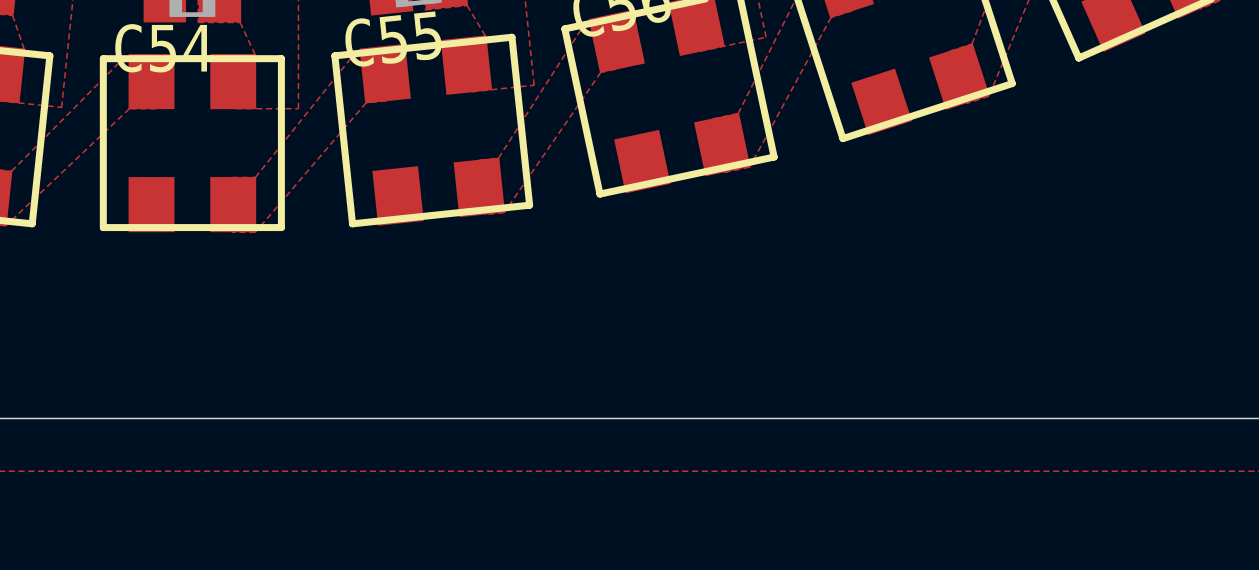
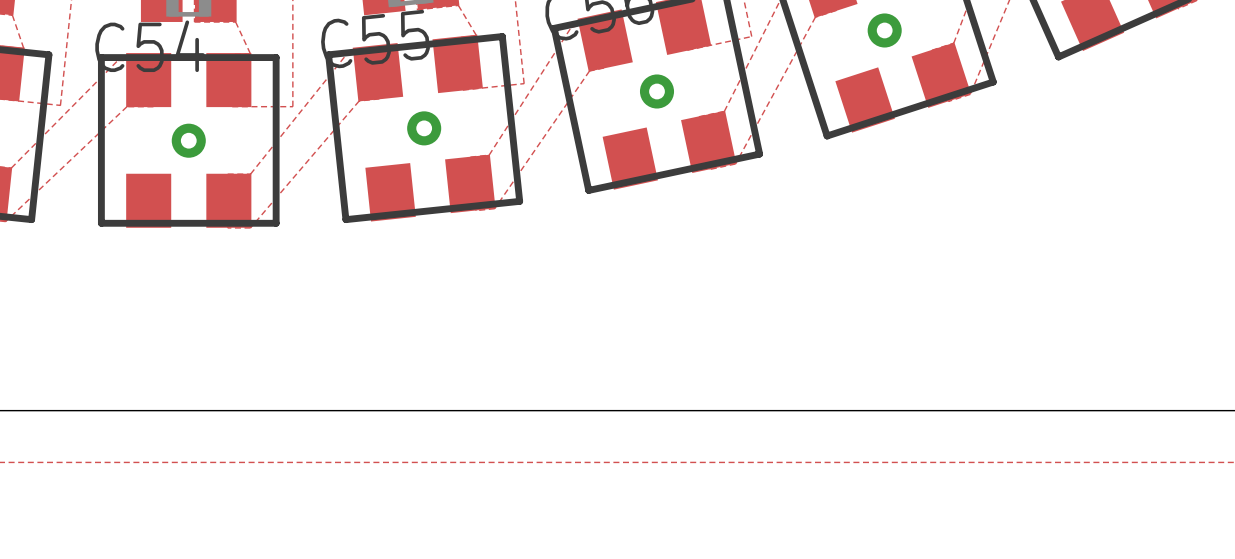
via: none -> (884, 30)
via: none -> (656, 91)
via: none -> (424, 128)
via: none -> (188, 140)

